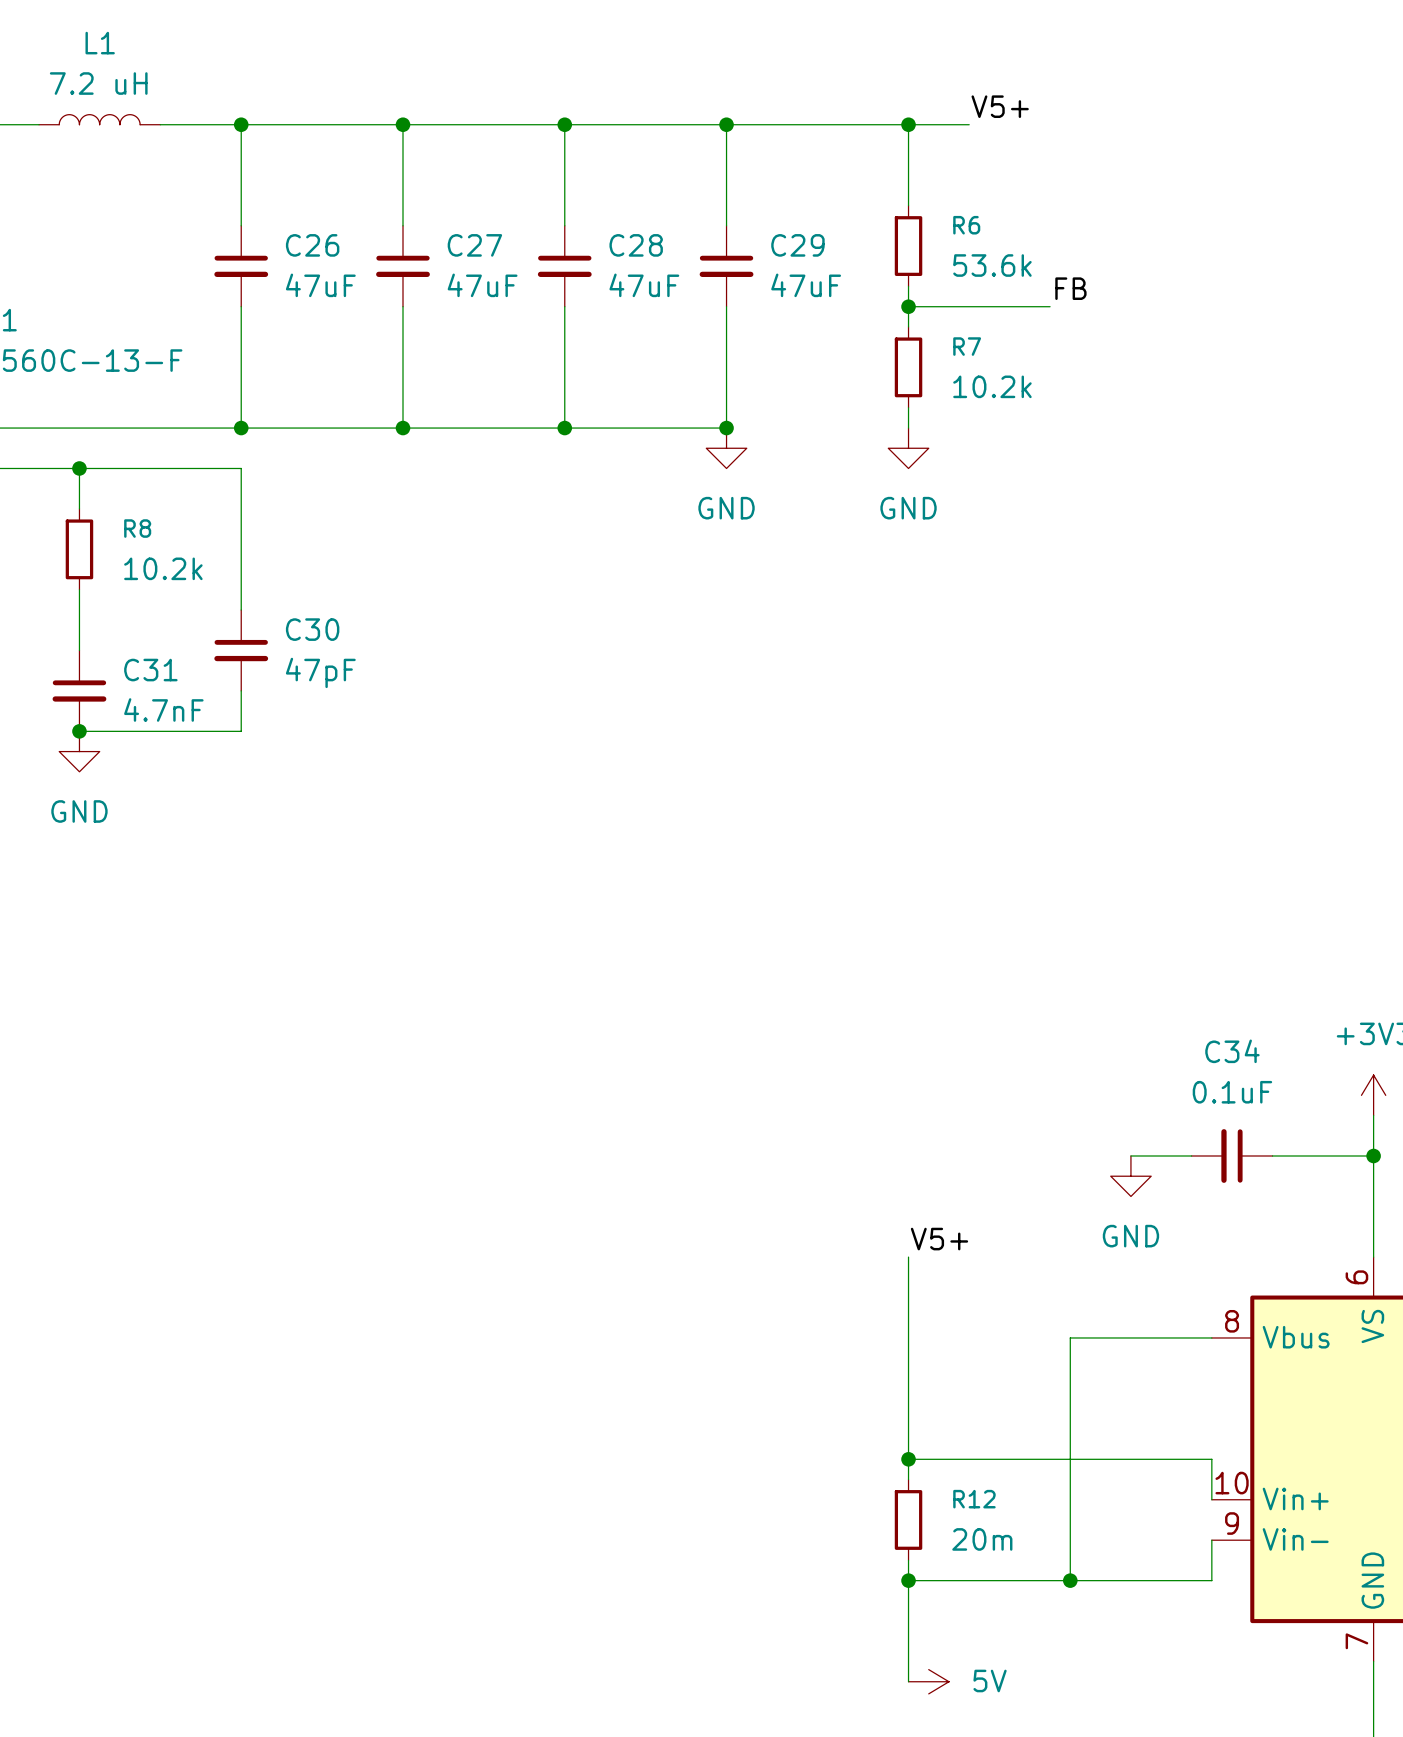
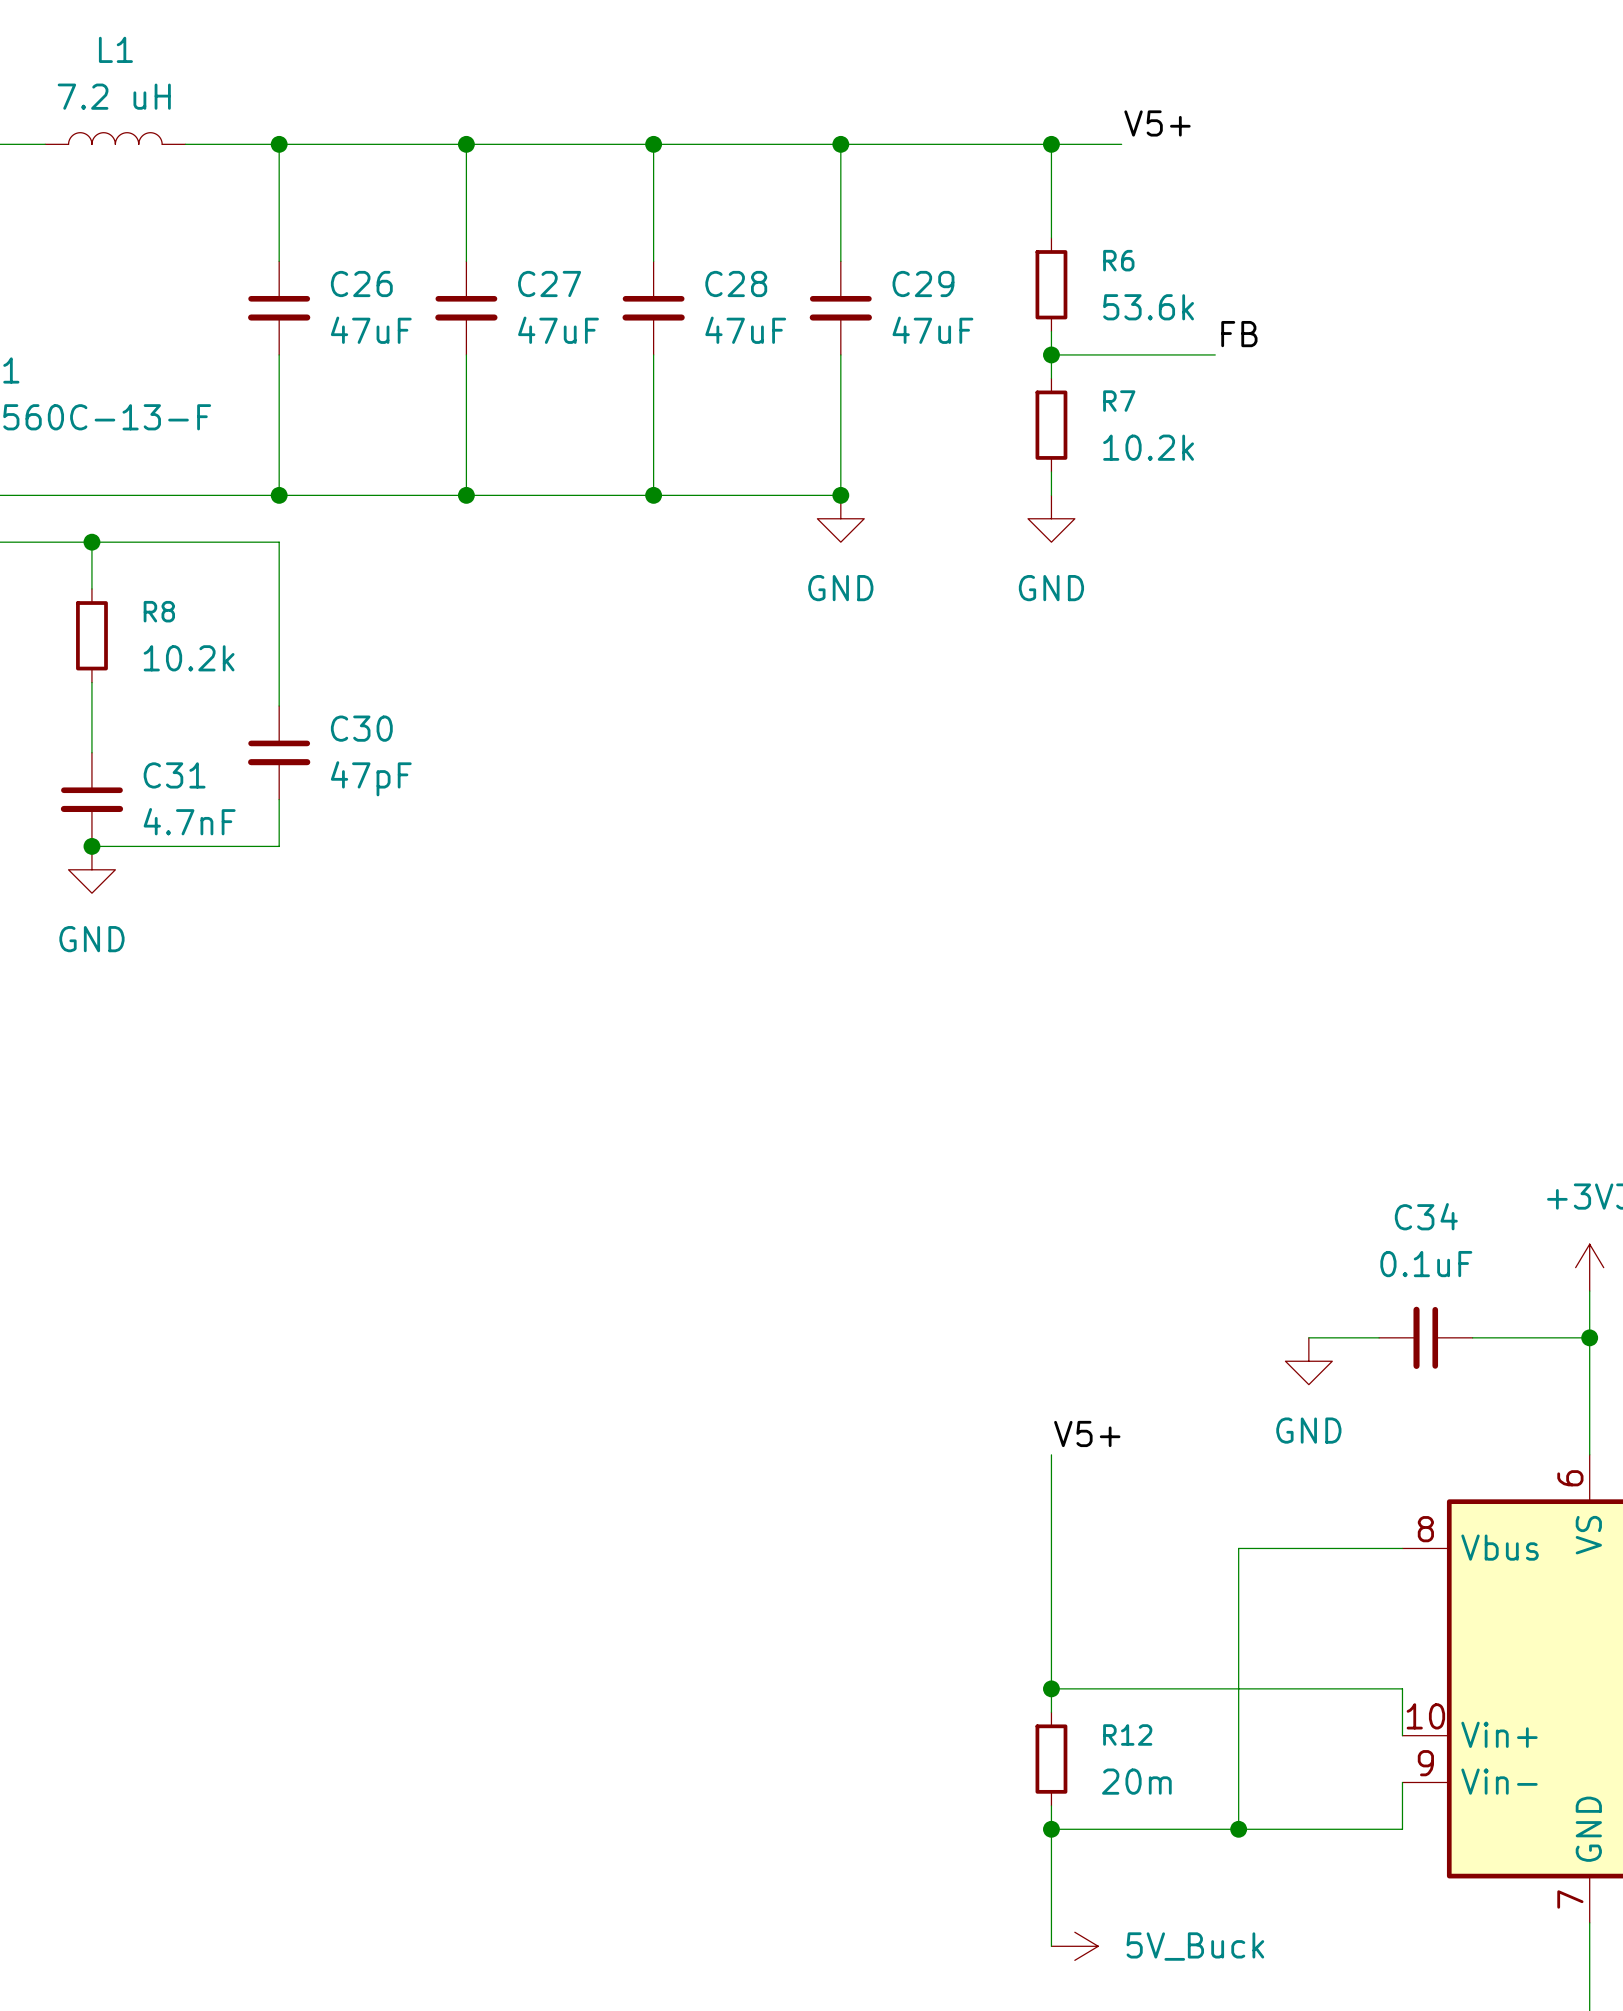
power symbol: 5V (928, 1681) -> 5V_Buck (1074, 1946)

